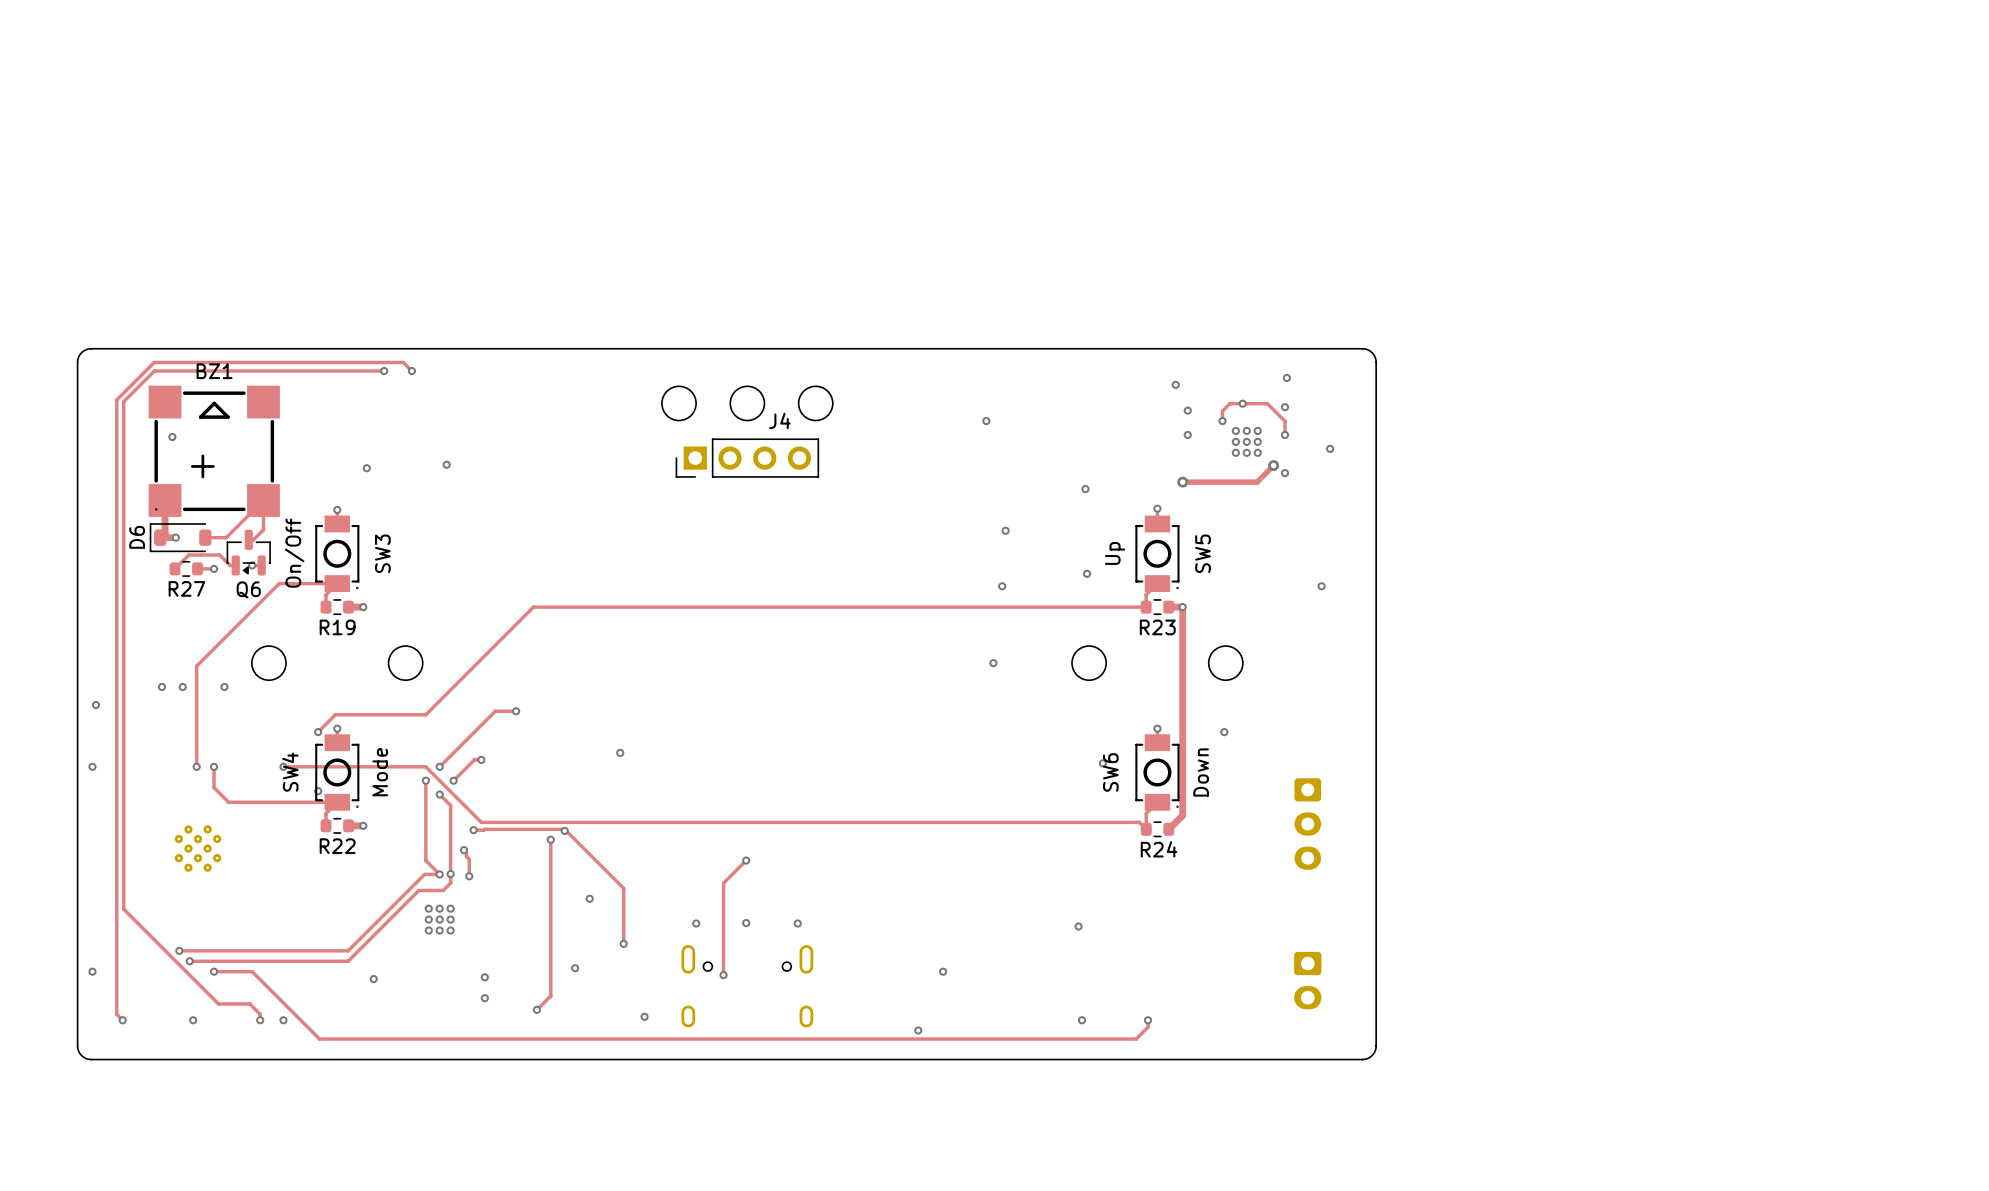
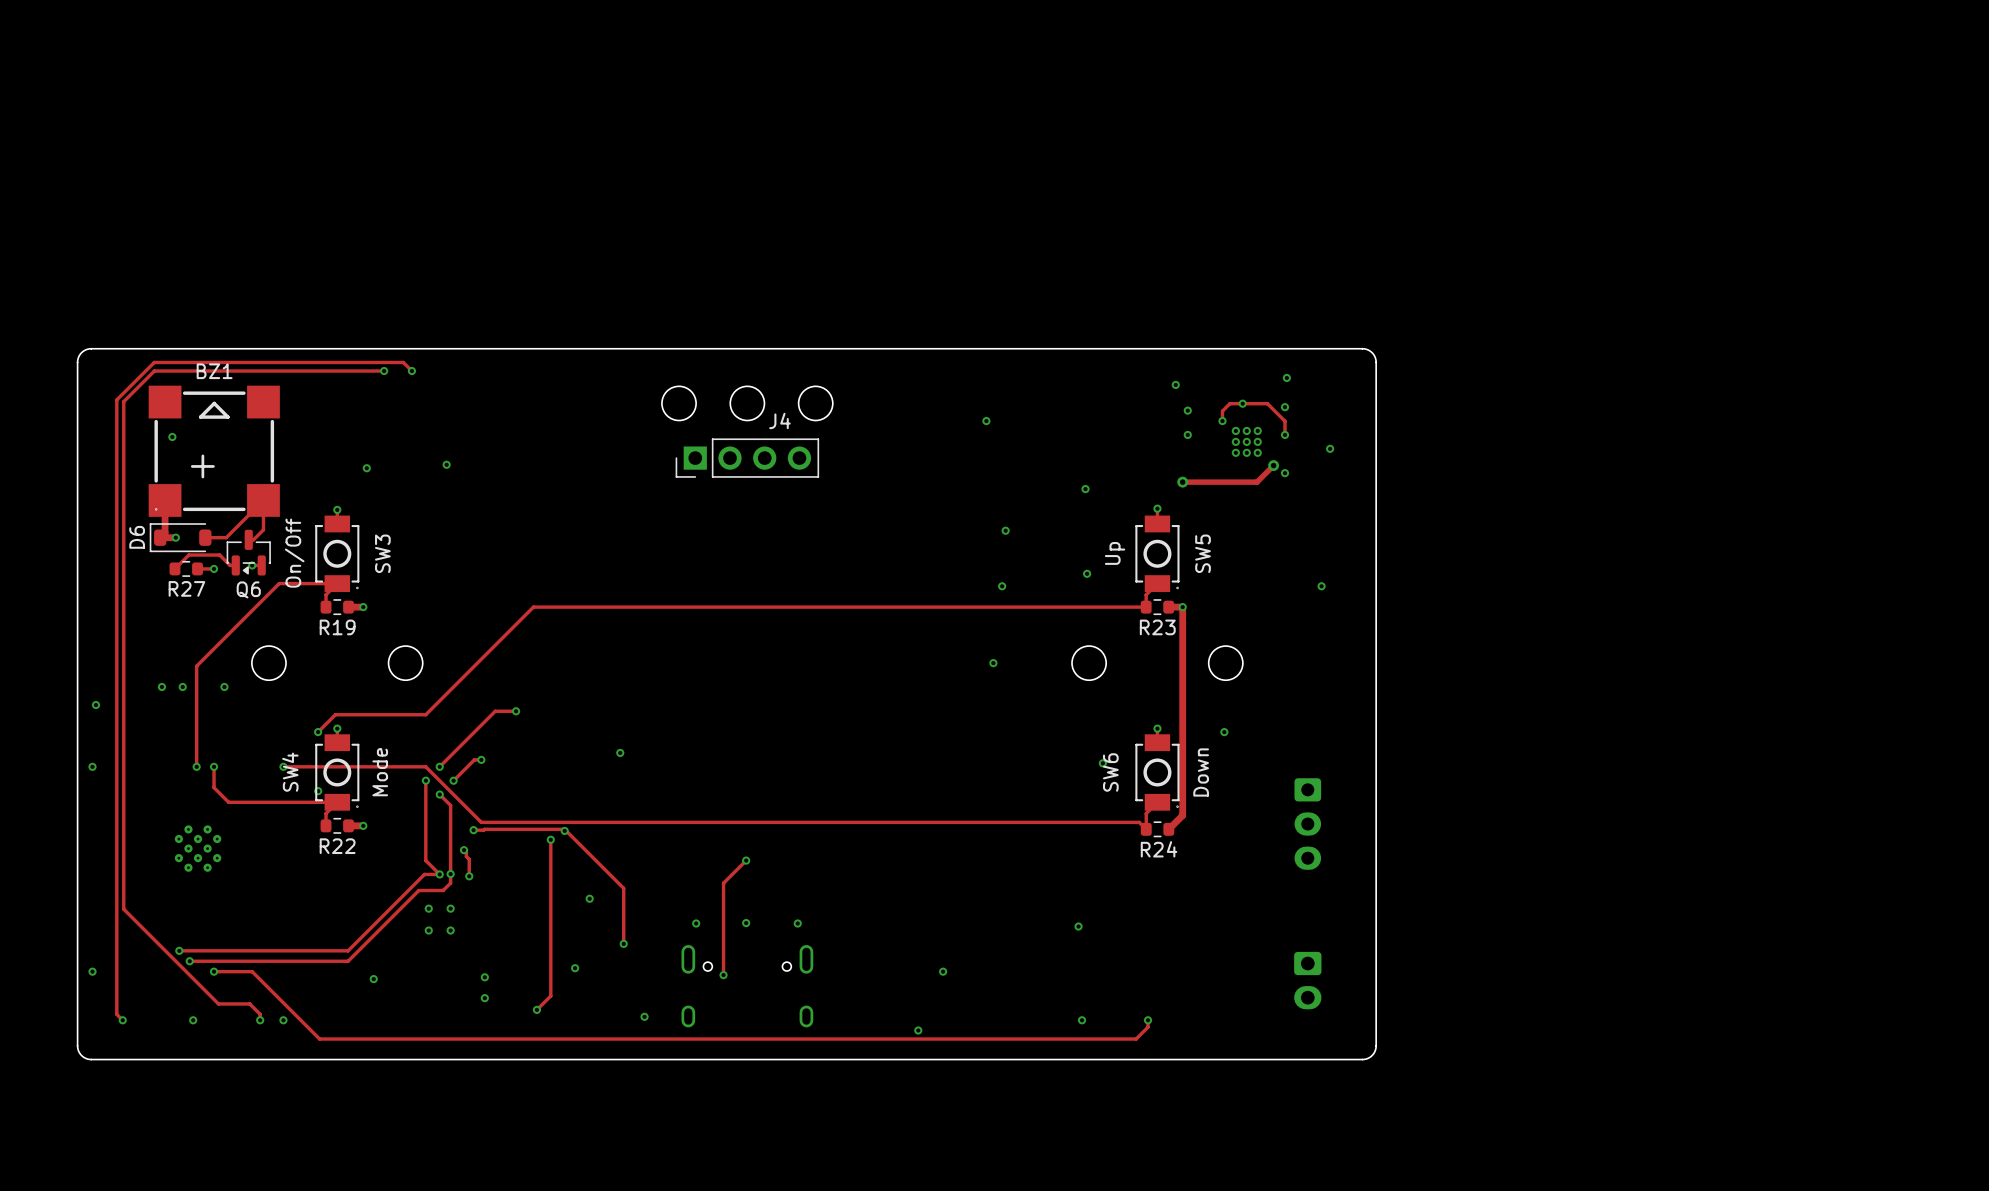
via: (439, 908) -> none
via: (428, 919) -> none
via: (439, 919) -> none
via: (450, 919) -> none
via: (439, 930) -> none

